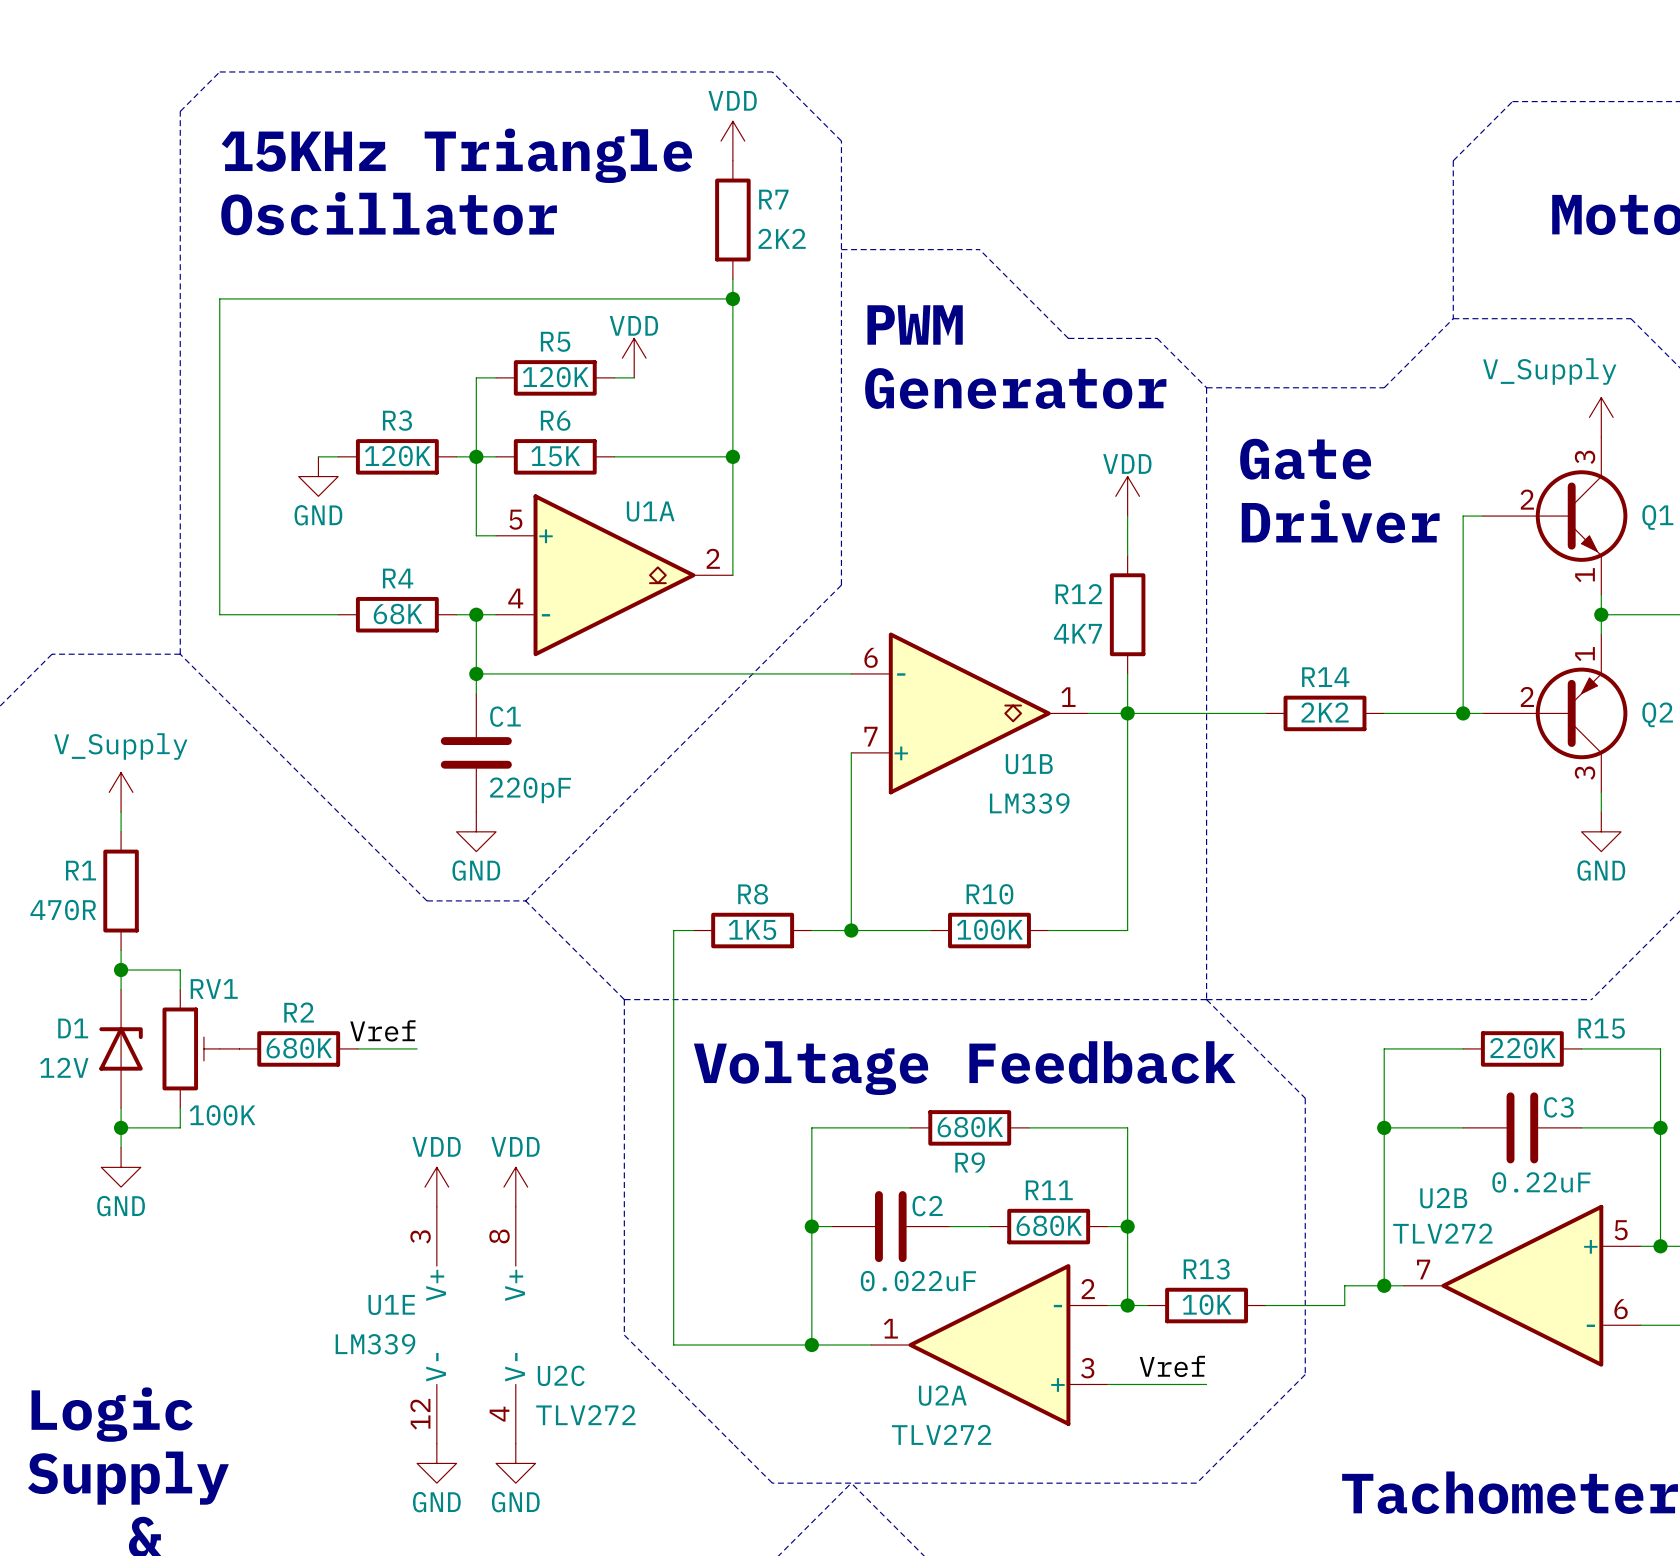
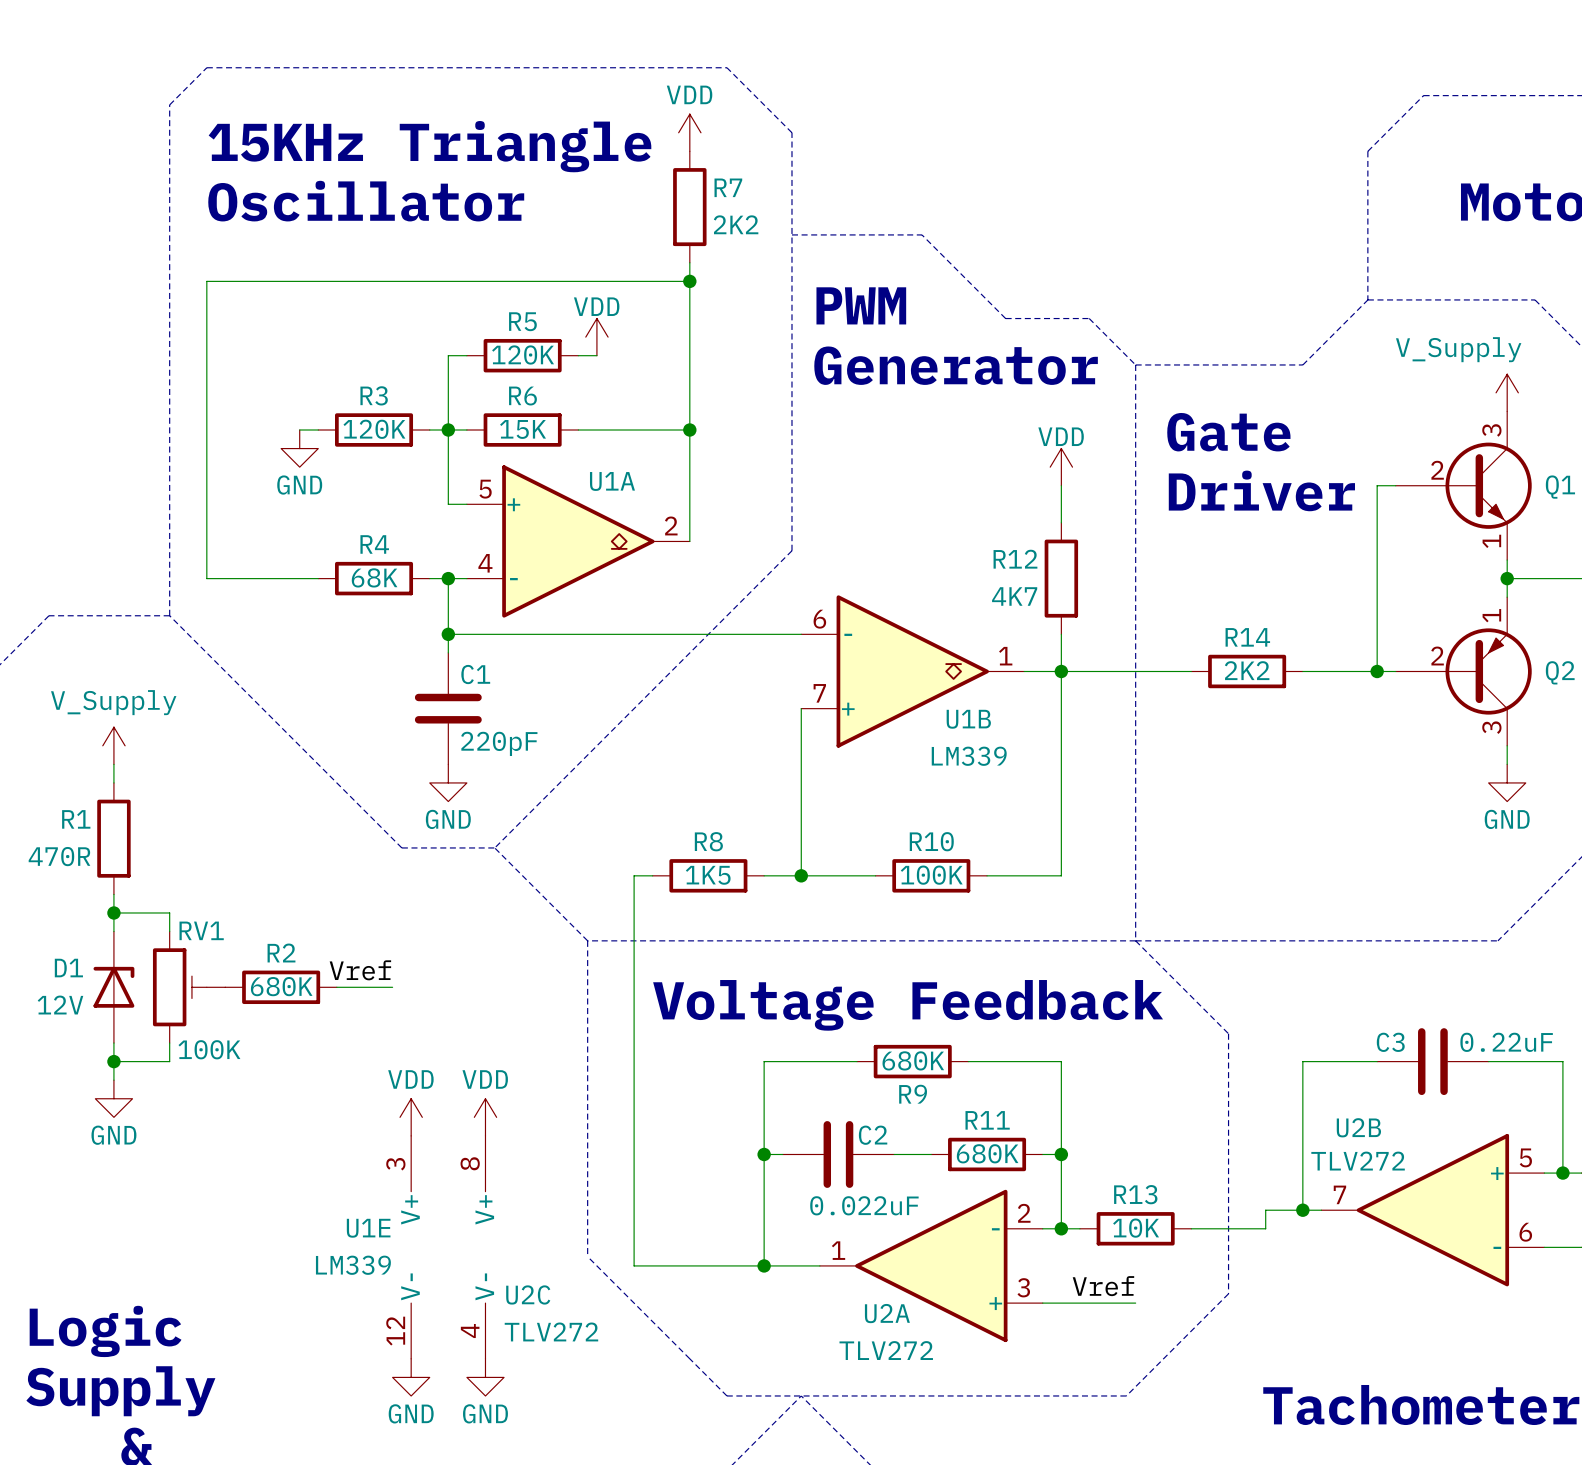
wire: (1463, 1048) (1384, 1048) (1384, 1127) -> none
R15: 220K (1522, 1048) -> none
wire: (1581, 1048) (1660, 1048) (1660, 1127) -> none
C3 name position: C3 (1558, 1107) -> C3 (1390, 1042)
junction: (1384, 1127) -> none
junction: (1660, 1127) -> none
C3 value position: 0.22uF (1541, 1182) -> 0.22uF (1506, 1042)

